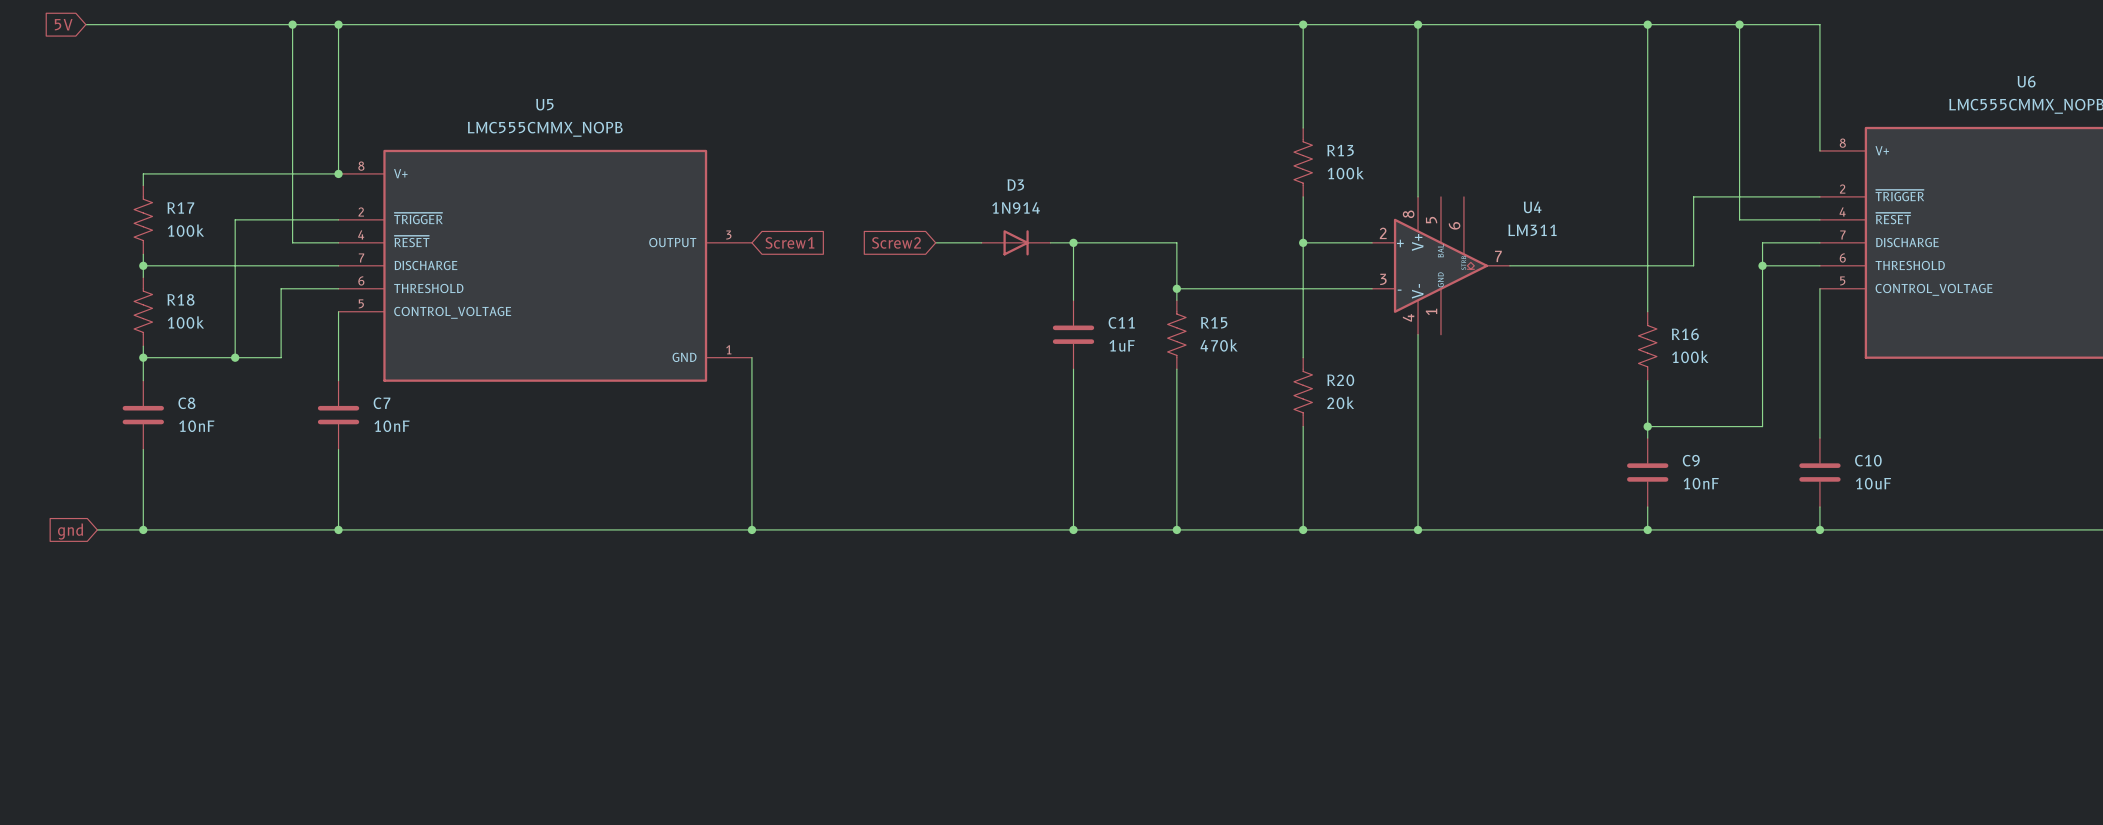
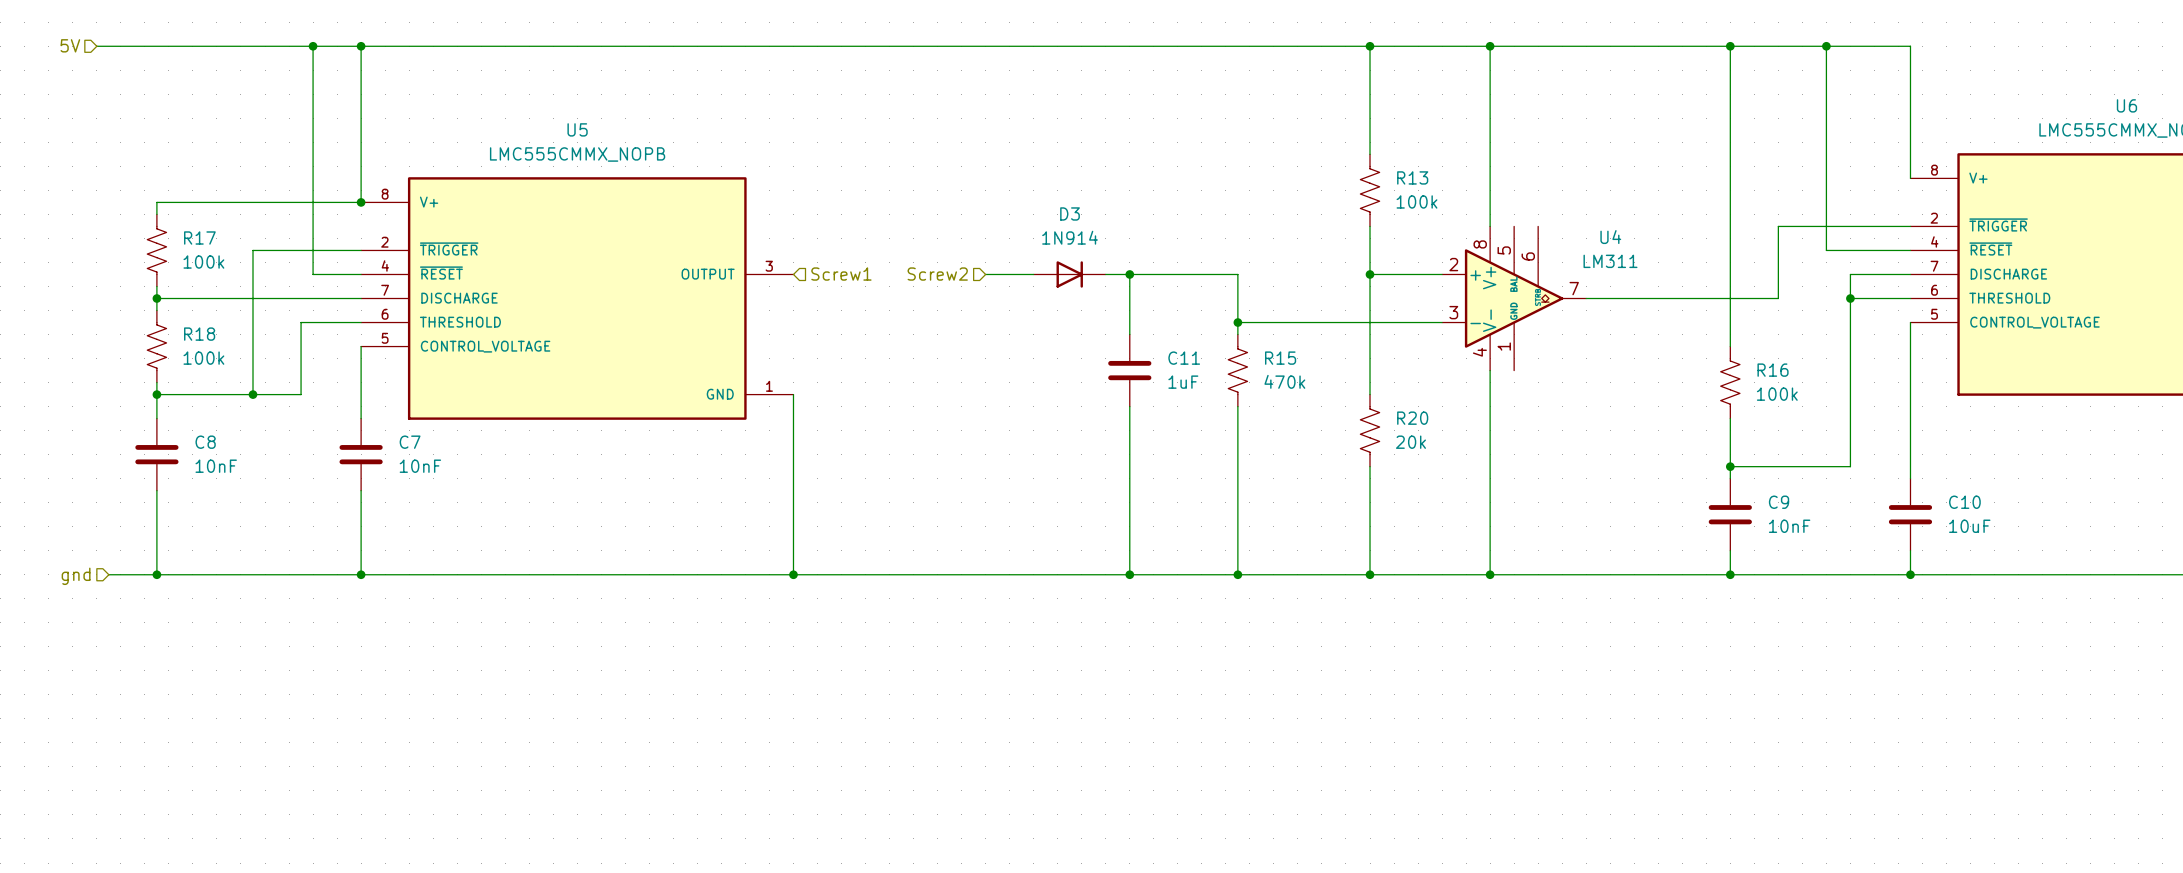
hierarchical label: none -> 5V (70, 45)
global label: 5V (63, 24) -> none
global label: Screw1 (789, 242) -> none
hierarchical label: none -> Screw1 (841, 274)
hierarchical label: none -> Screw2 (937, 274)
global label: Screw2 (896, 242) -> none
hierarchical label: none -> gnd (76, 576)
global label: gnd (70, 531) -> none

